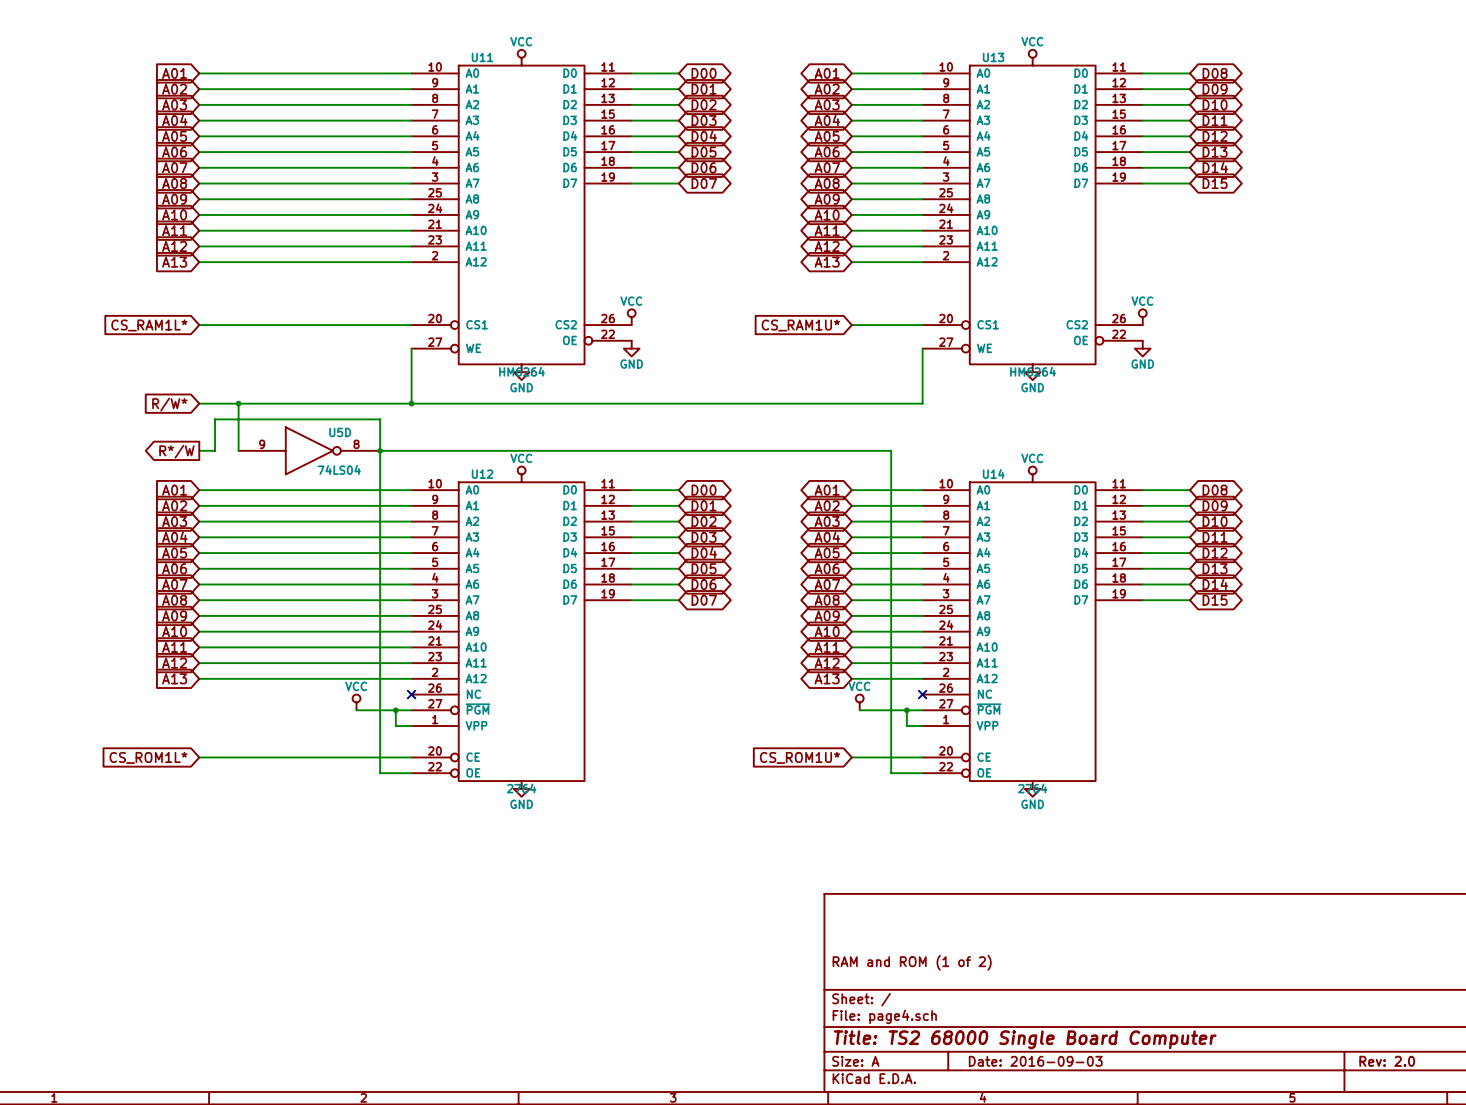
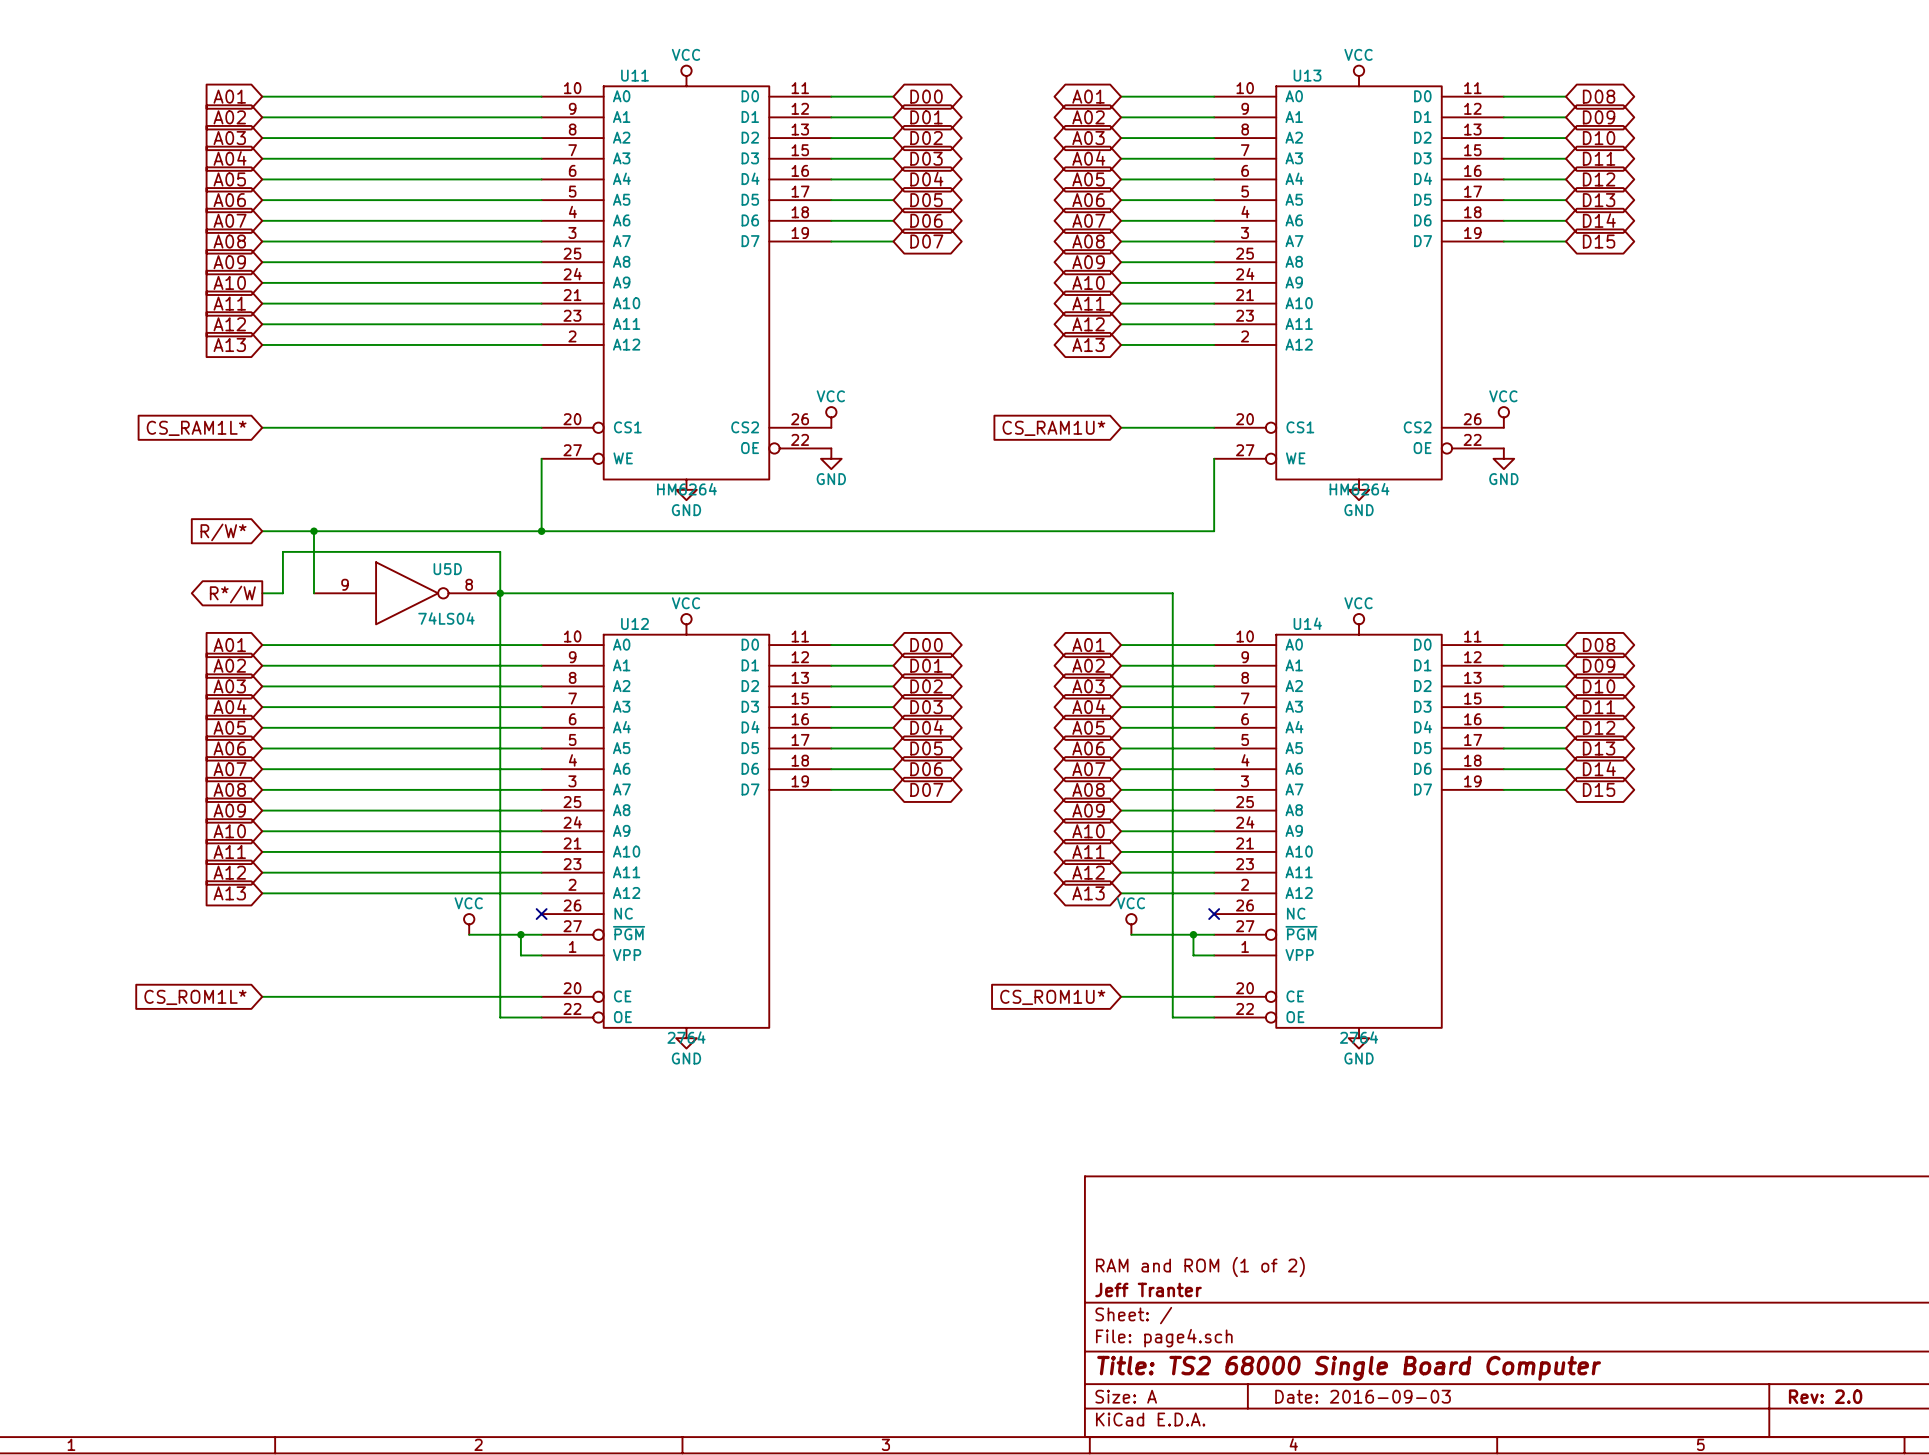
title block: none -> Jeff Tranter (1148, 1289)

